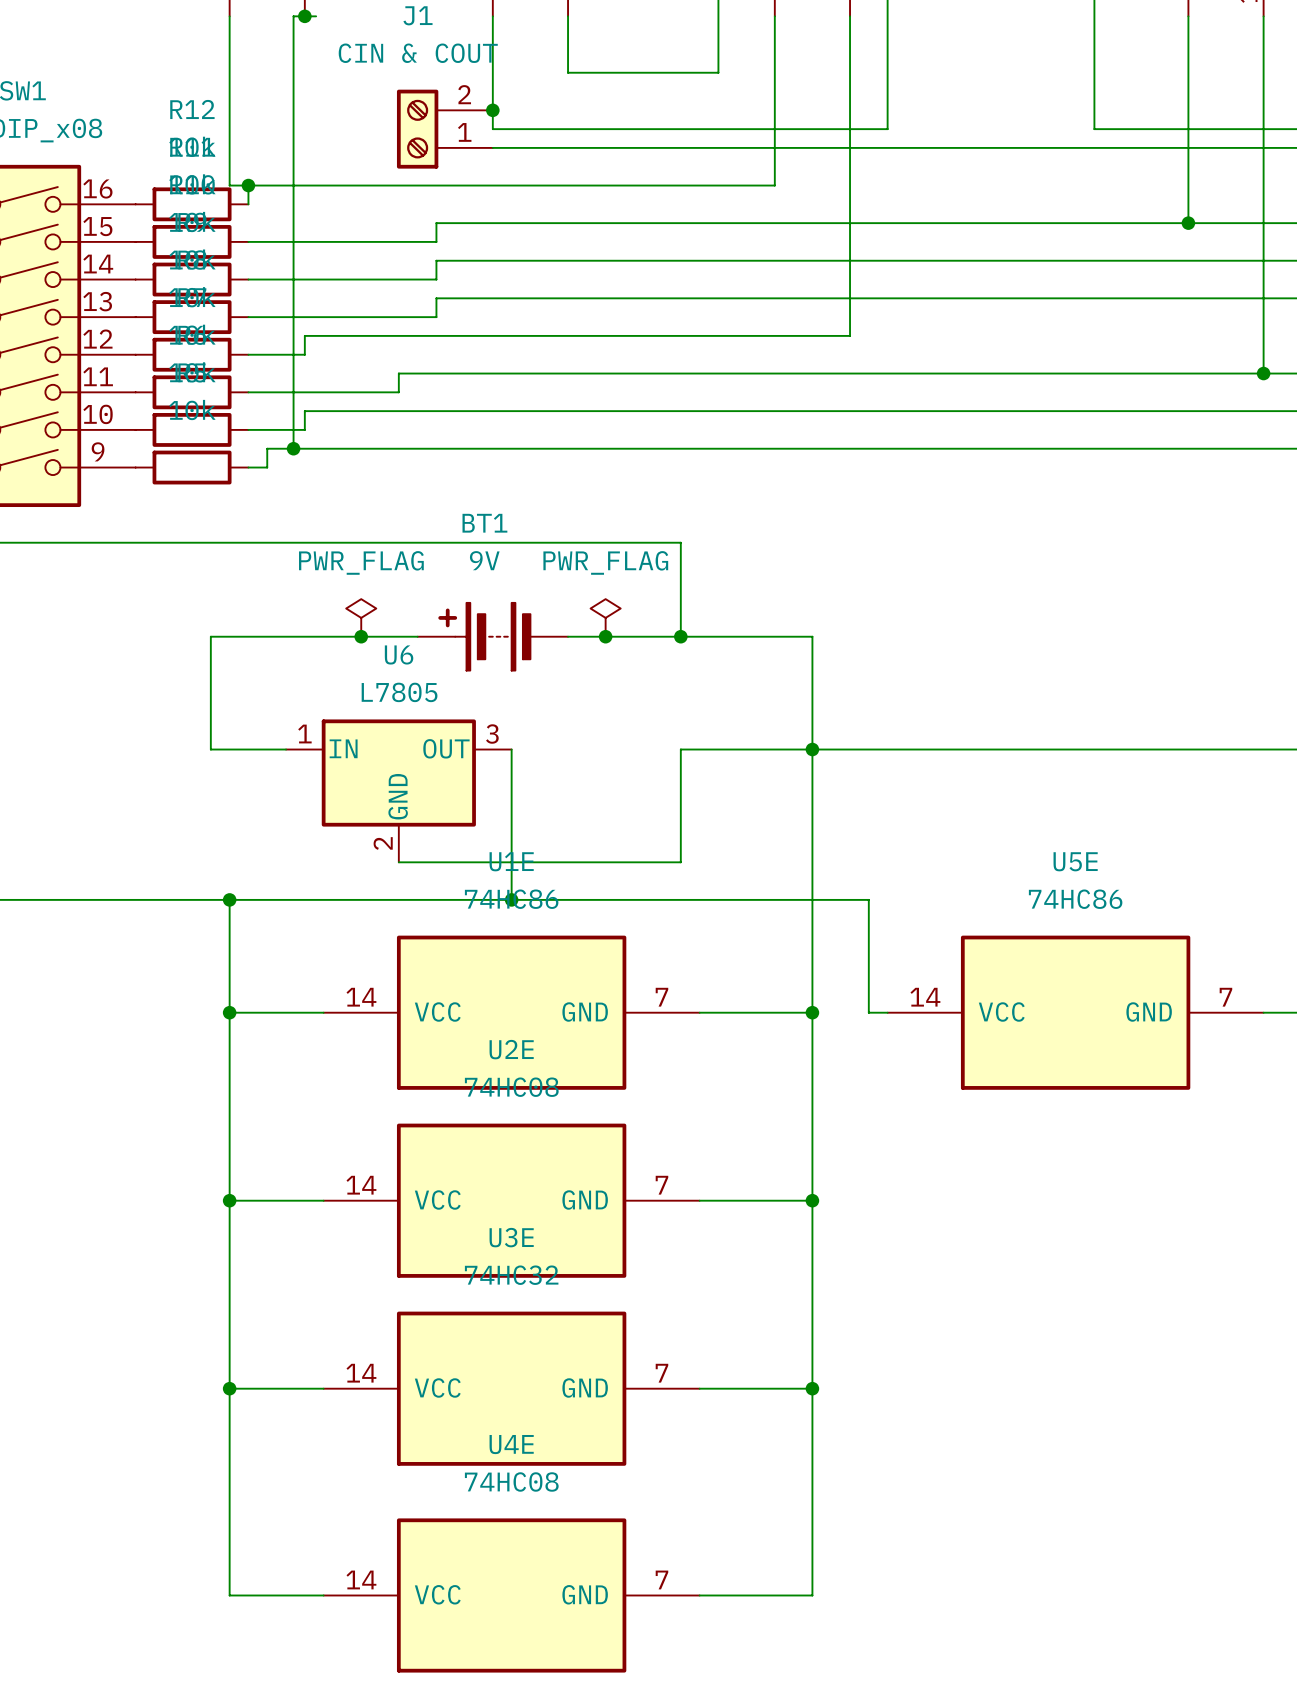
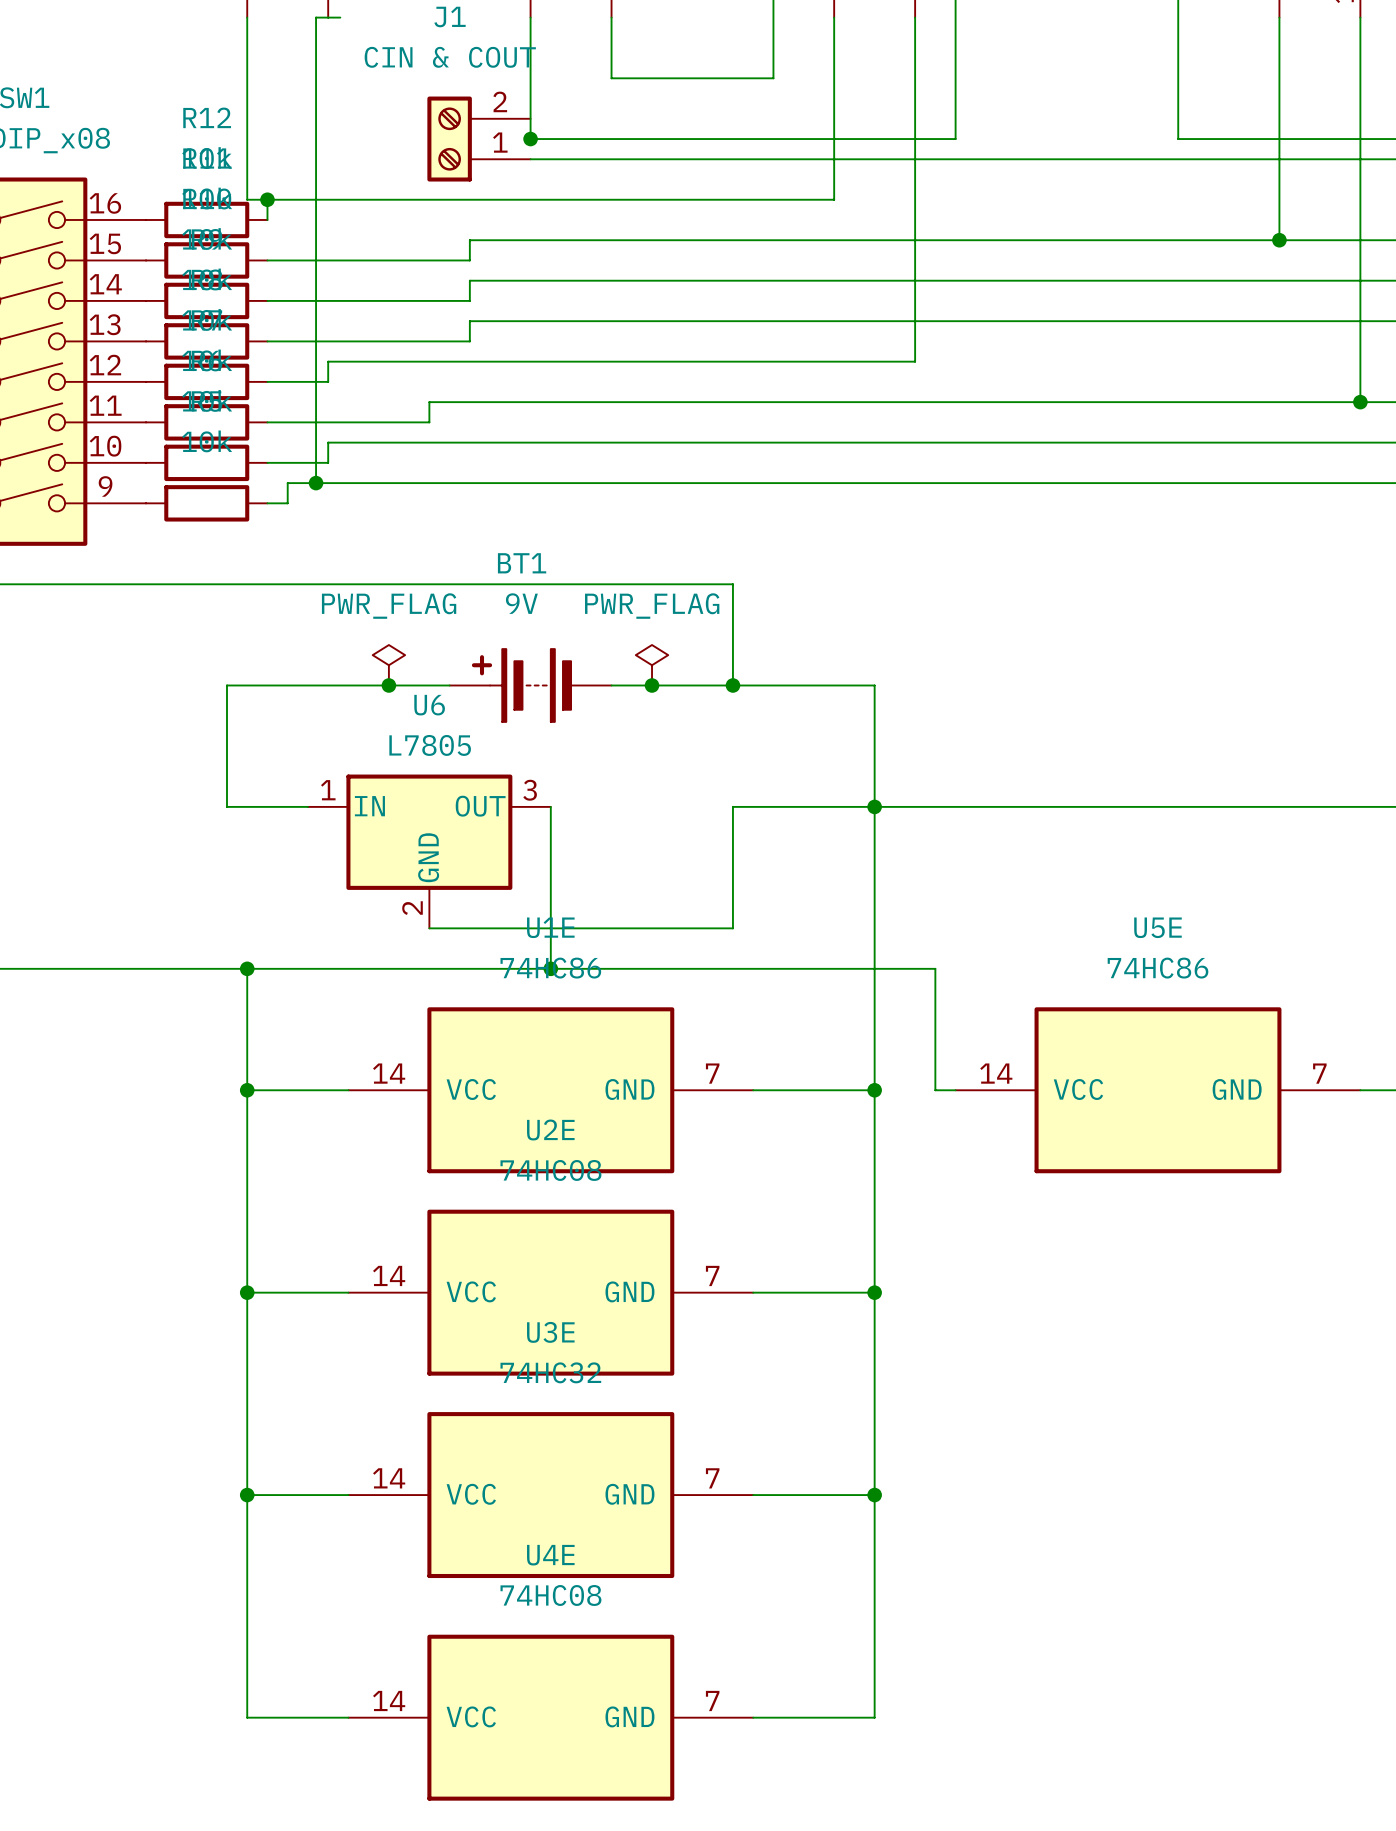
junction: (304, 16) -> none
junction position: (492, 110) -> (530, 139)

